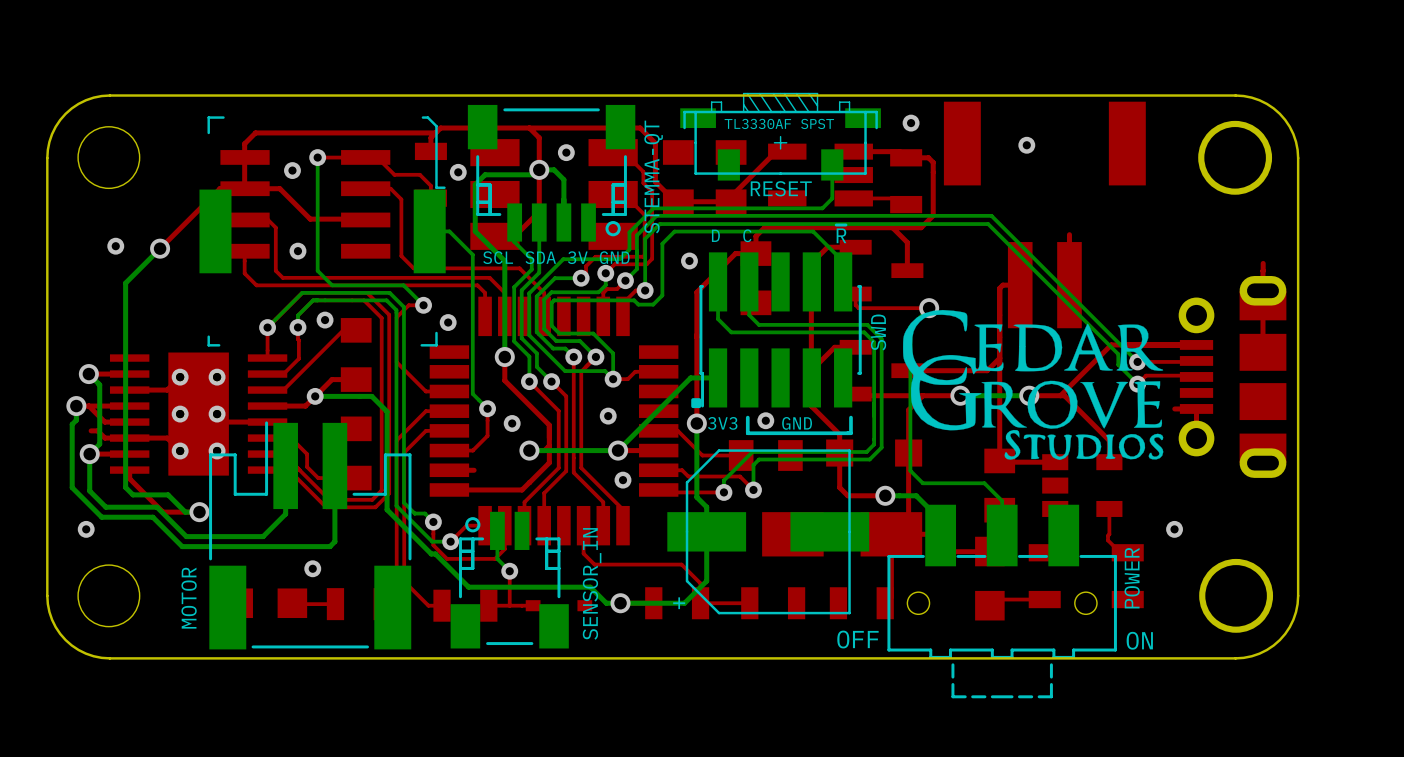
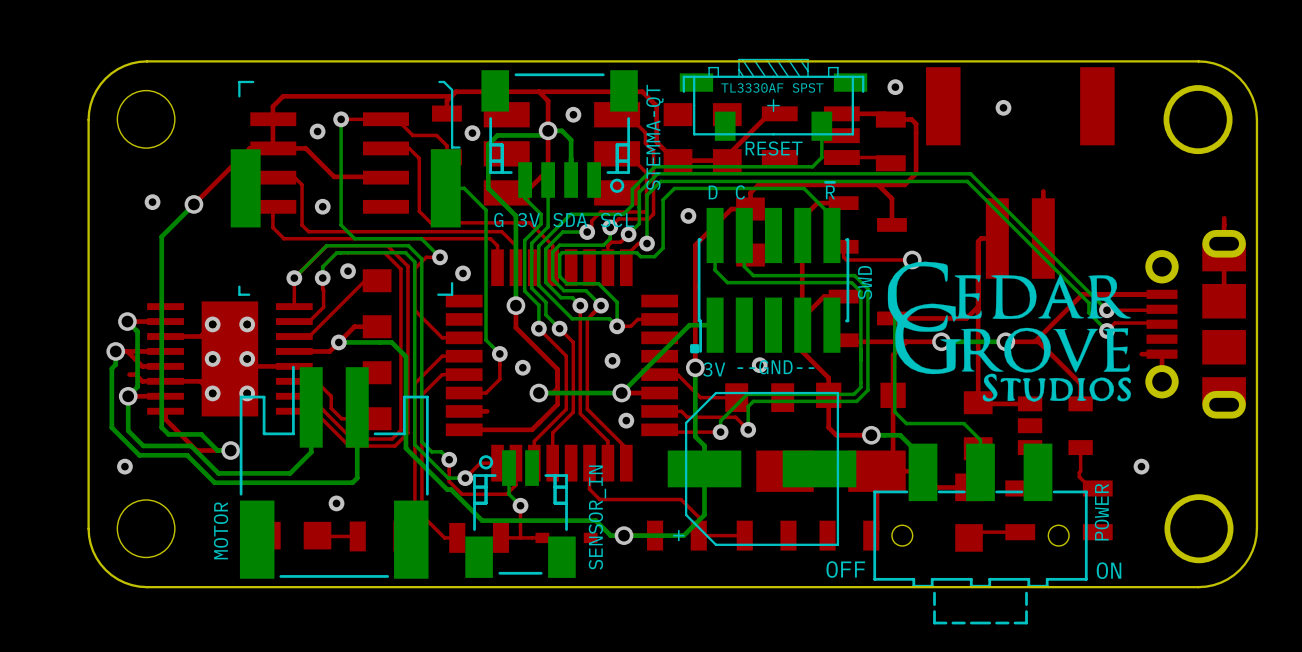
text: D C (731, 235) -> D (713, 192)
text: none -> C (740, 192)
text: SCL SDA 3V GND (556, 257) -> G 3V SDA SCL (564, 220)
line: (850, 417) (850, 433) (747, 433) (747, 417) -> none
text: none -> --GND-- (775, 367)
text: 3V3 GND (759, 423) -> 3V (714, 369)

